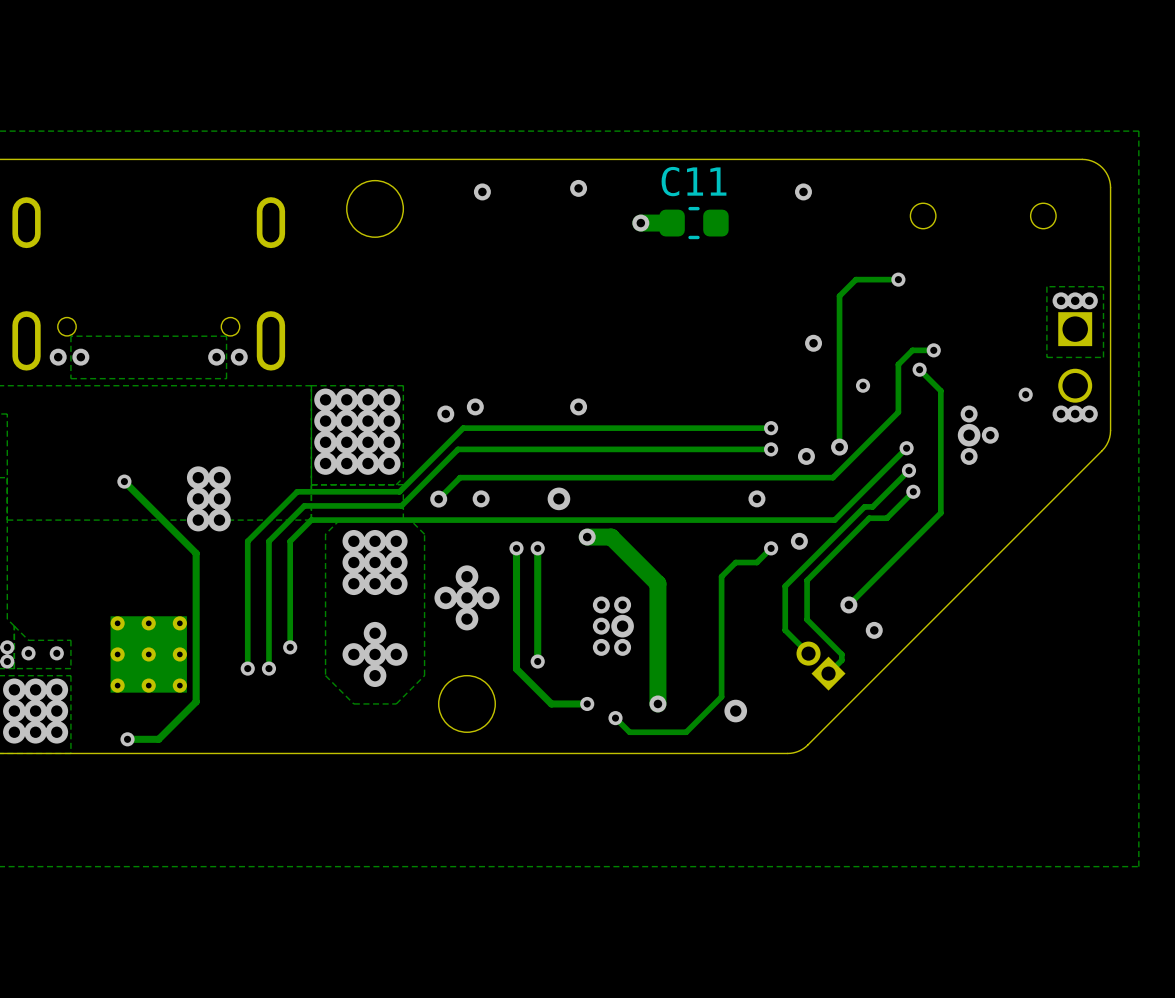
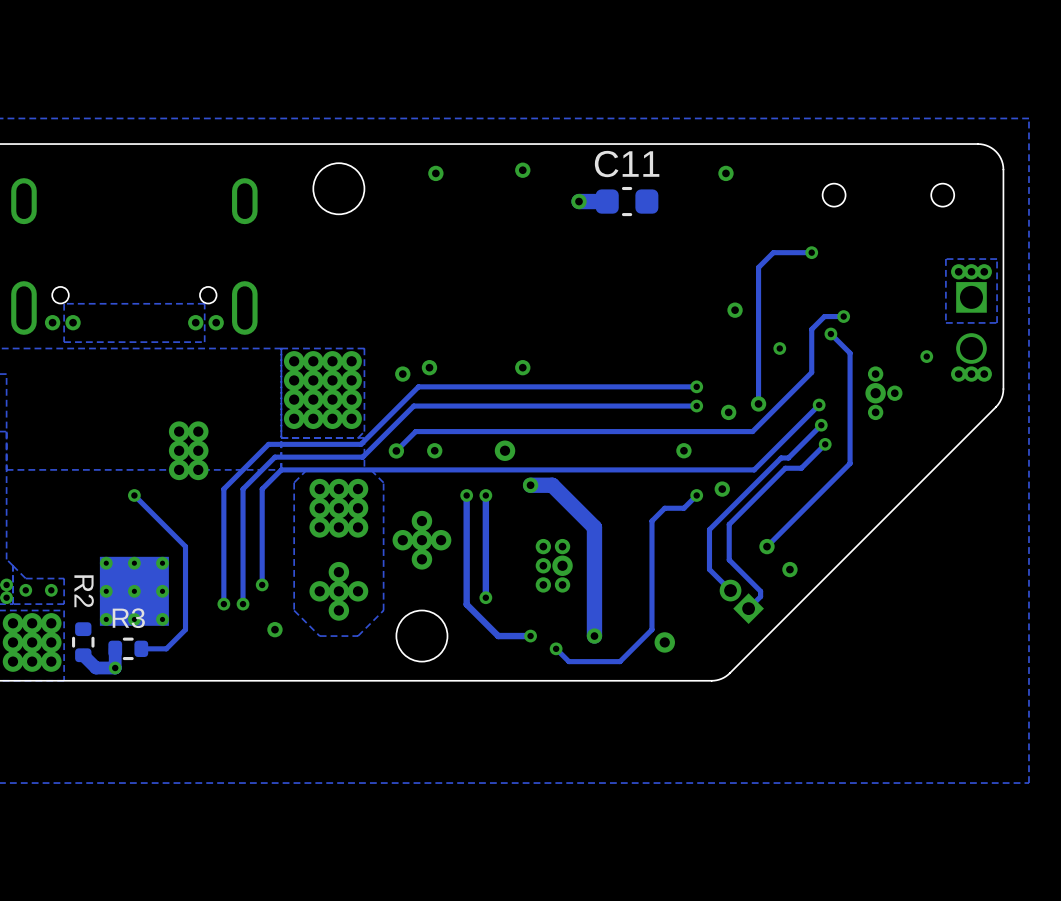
track: (124, 481) (196, 553) (196, 701) (158, 739) (127, 739) -> none
via position: (124, 481) -> (134, 495)
track: none -> (134, 495) (185, 546) (185, 629) (166, 648) (141, 648)
via: none -> (274, 629)
R2: none -> (83, 642)
track: none -> (115, 648) (115, 668) (96, 668) (83, 655)
R3: none -> (128, 648)

